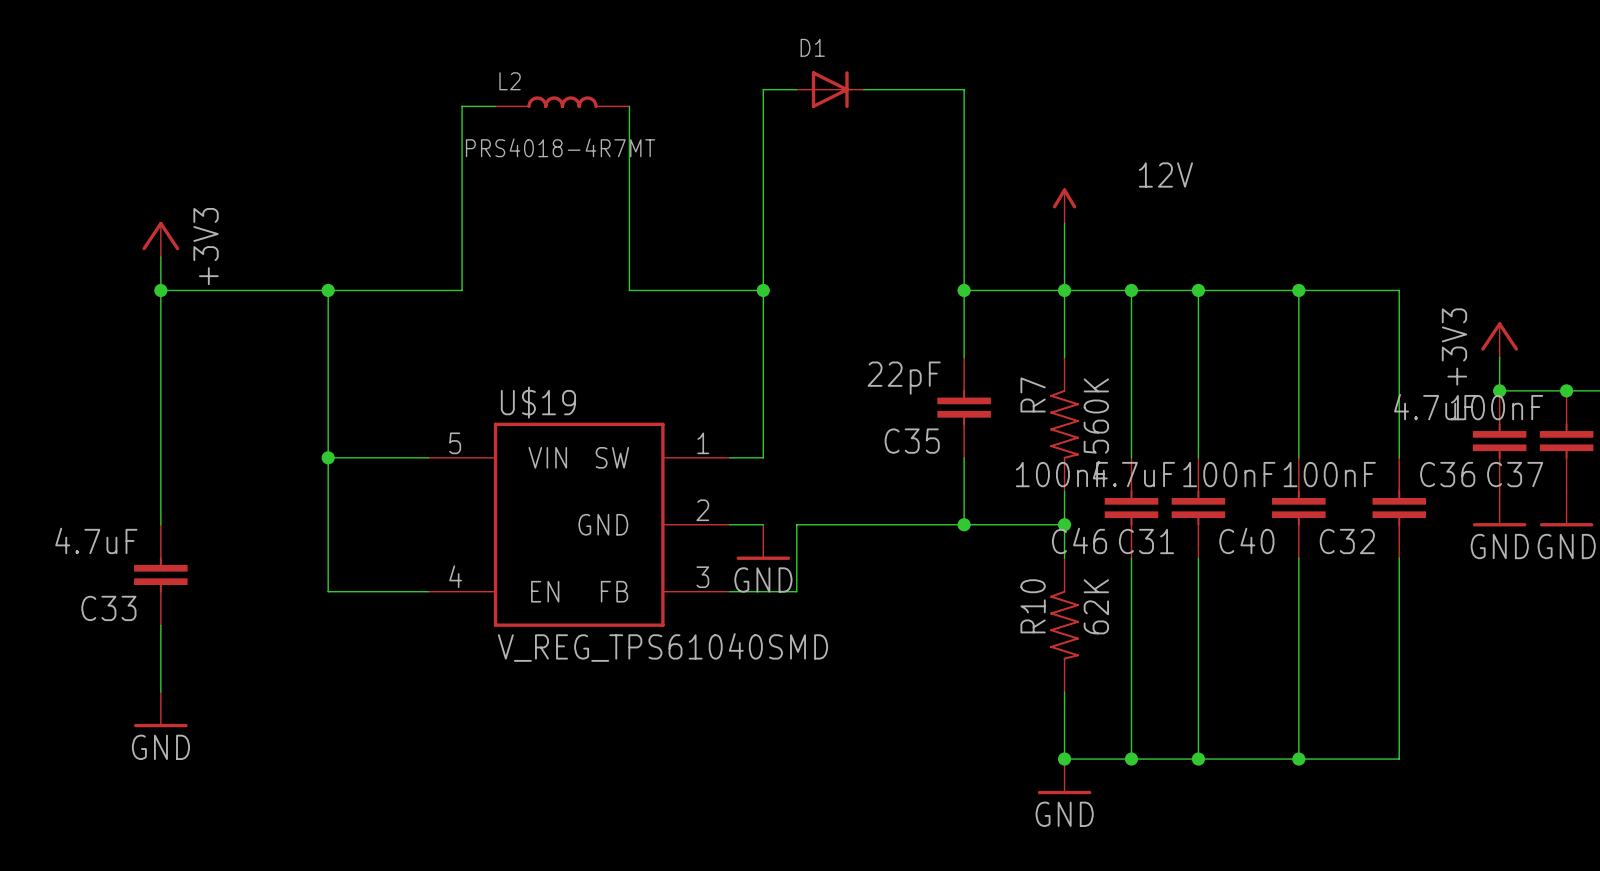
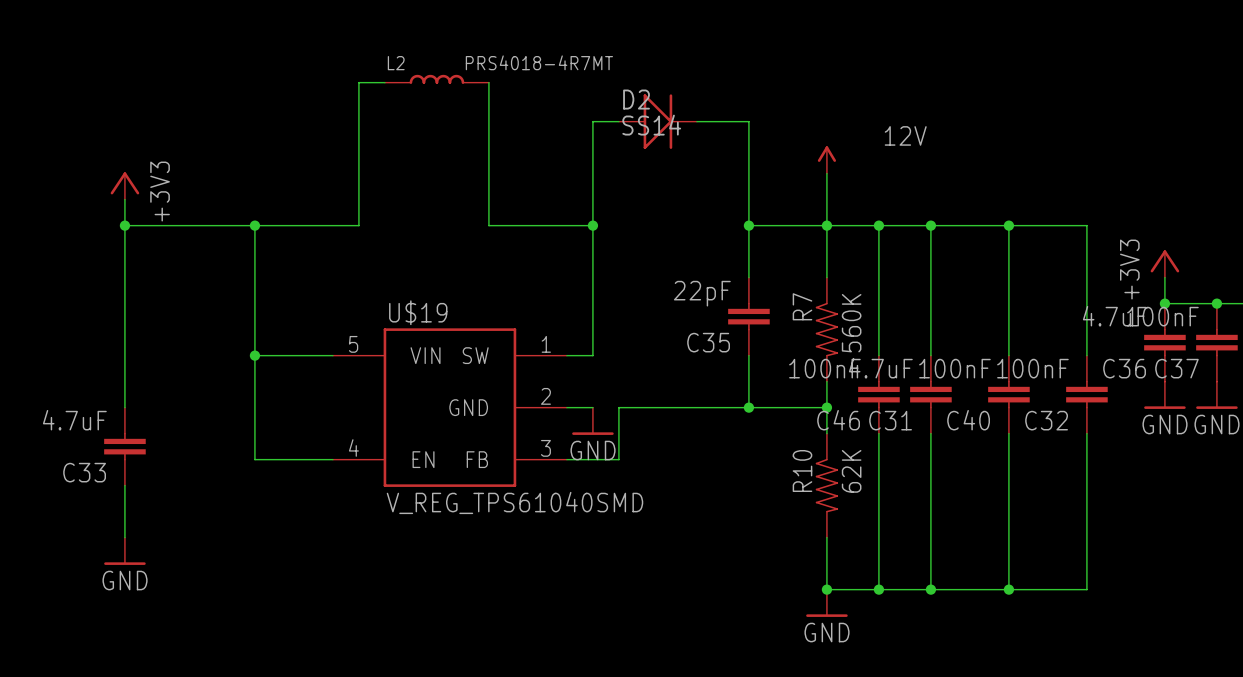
wire: (796, 89) (763, 89) (763, 156) -> (618, 121) (592, 121)
D1: (830, 89) -> none
wire: (863, 89) (964, 89) (964, 156) -> (696, 121) (748, 121)
L2 value position: PRS4018-4R7MT (560, 147) -> PRS4018-4R7MT (539, 62)
D2: none -> SS14 (657, 121)

